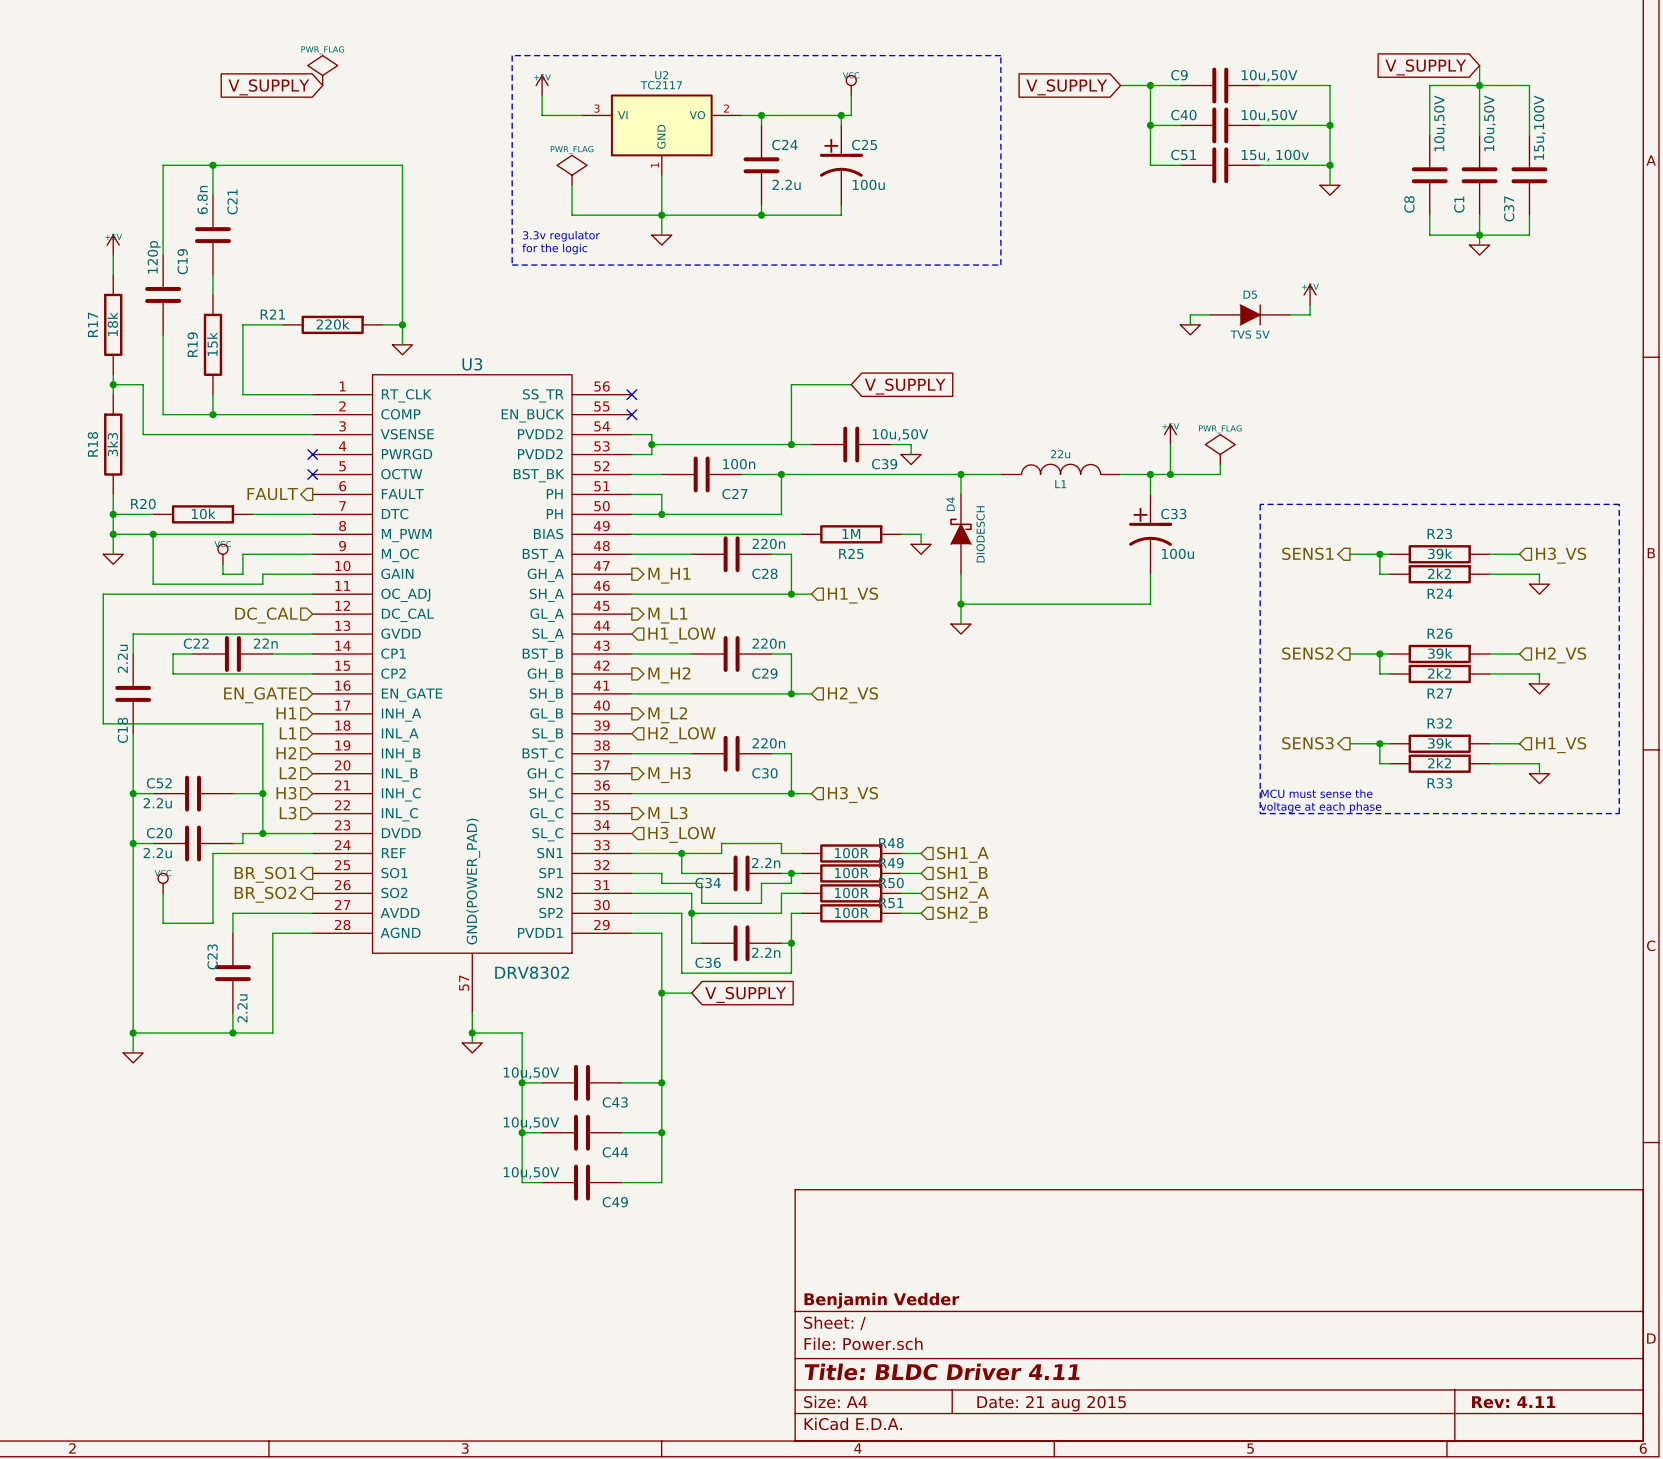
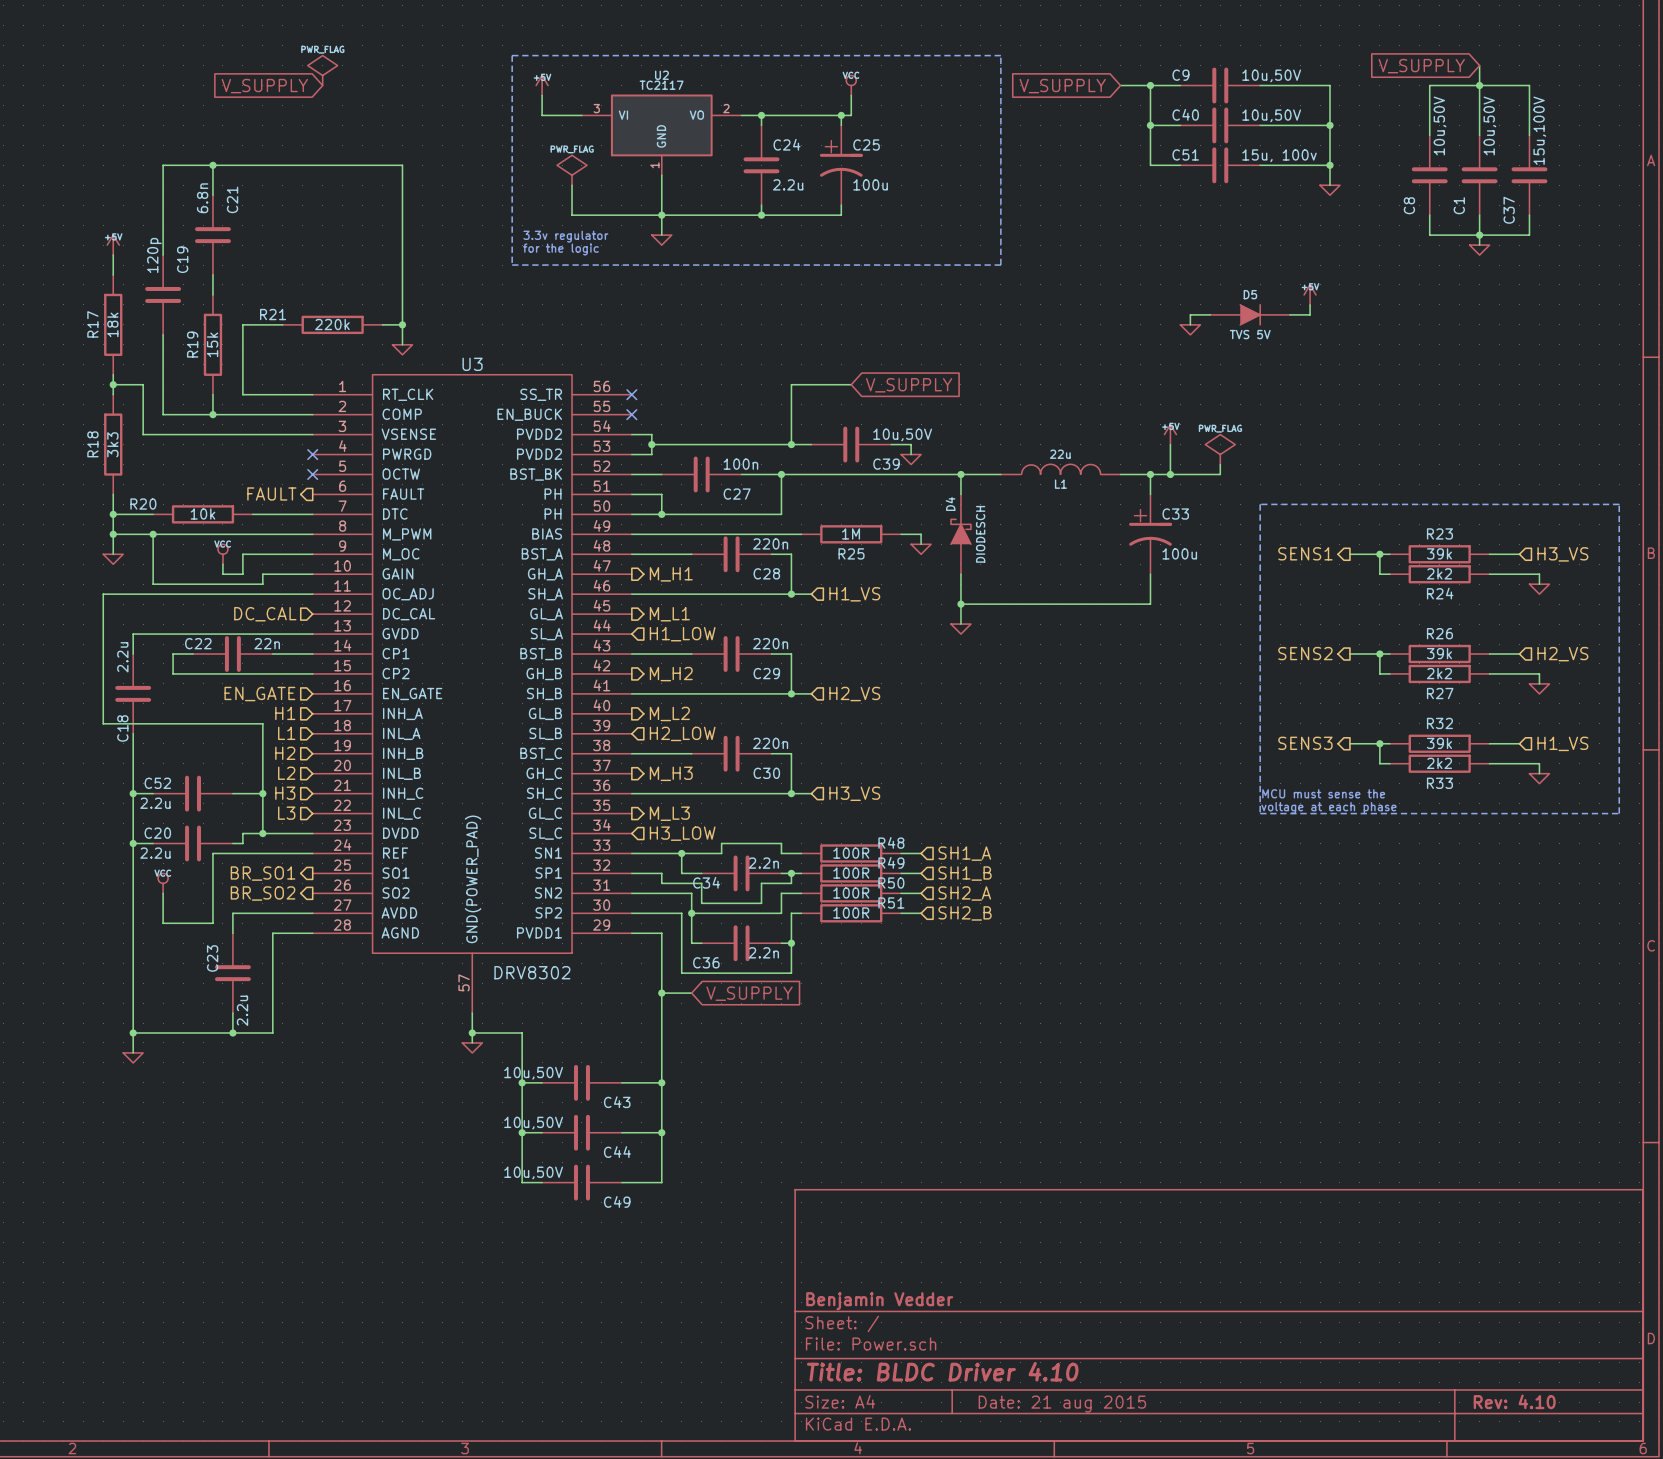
title block: Title: BLDC Driver 4.11 (942, 1371) -> Title: BLDC Driver 4.10 (942, 1371)
title block: Rev: 4.11 (1513, 1402) -> Rev: 4.10 (1514, 1401)

